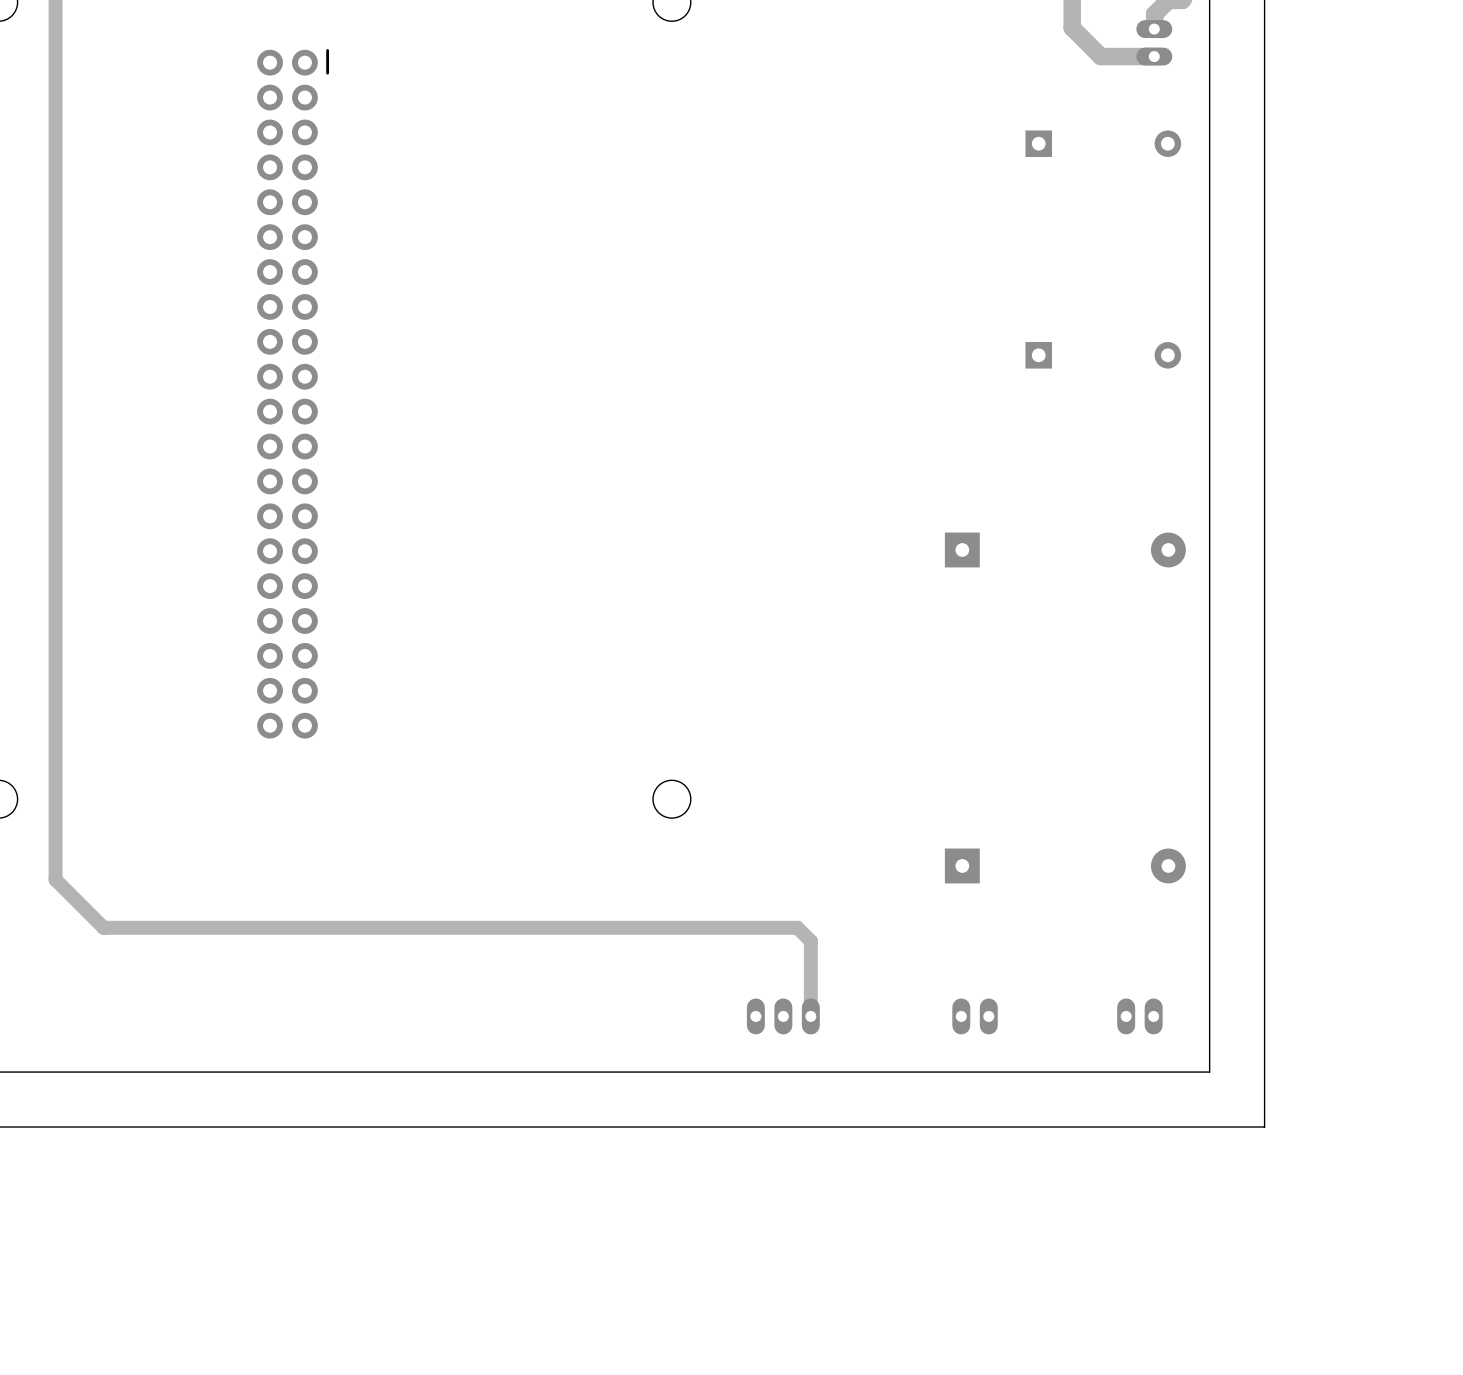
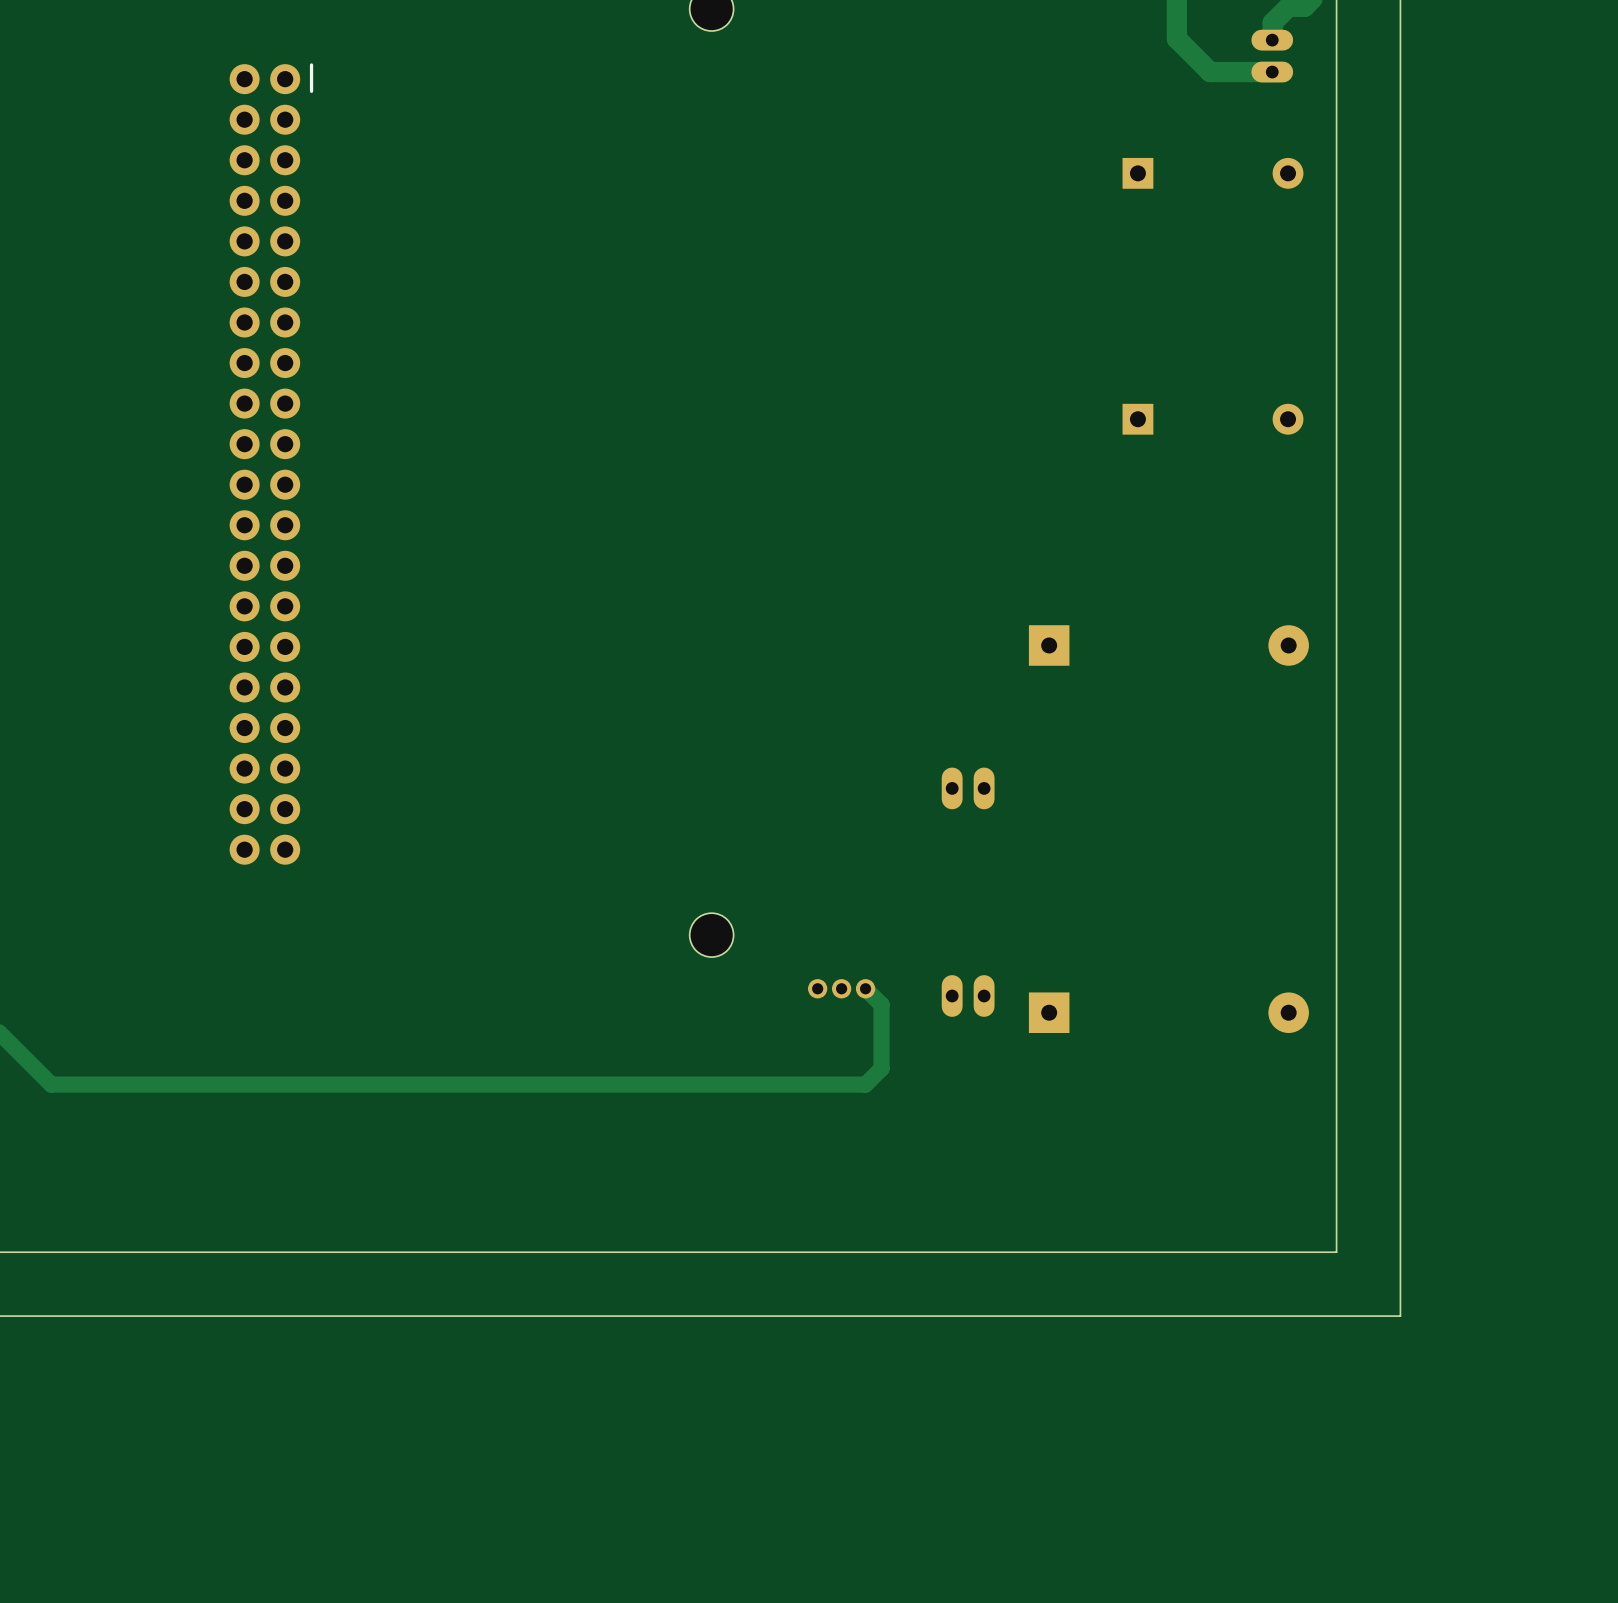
part: none -> (968, 788)
part: none -> (841, 988)
part: none -> (968, 995)
track: (797, 927) (810, 941) (810, 1016) -> (857, 1084) (865, 1084) (881, 1068) (881, 1004) (865, 988)
part: (783, 1016) -> none
part: (975, 1016) -> none
part: (1139, 1016) -> none

